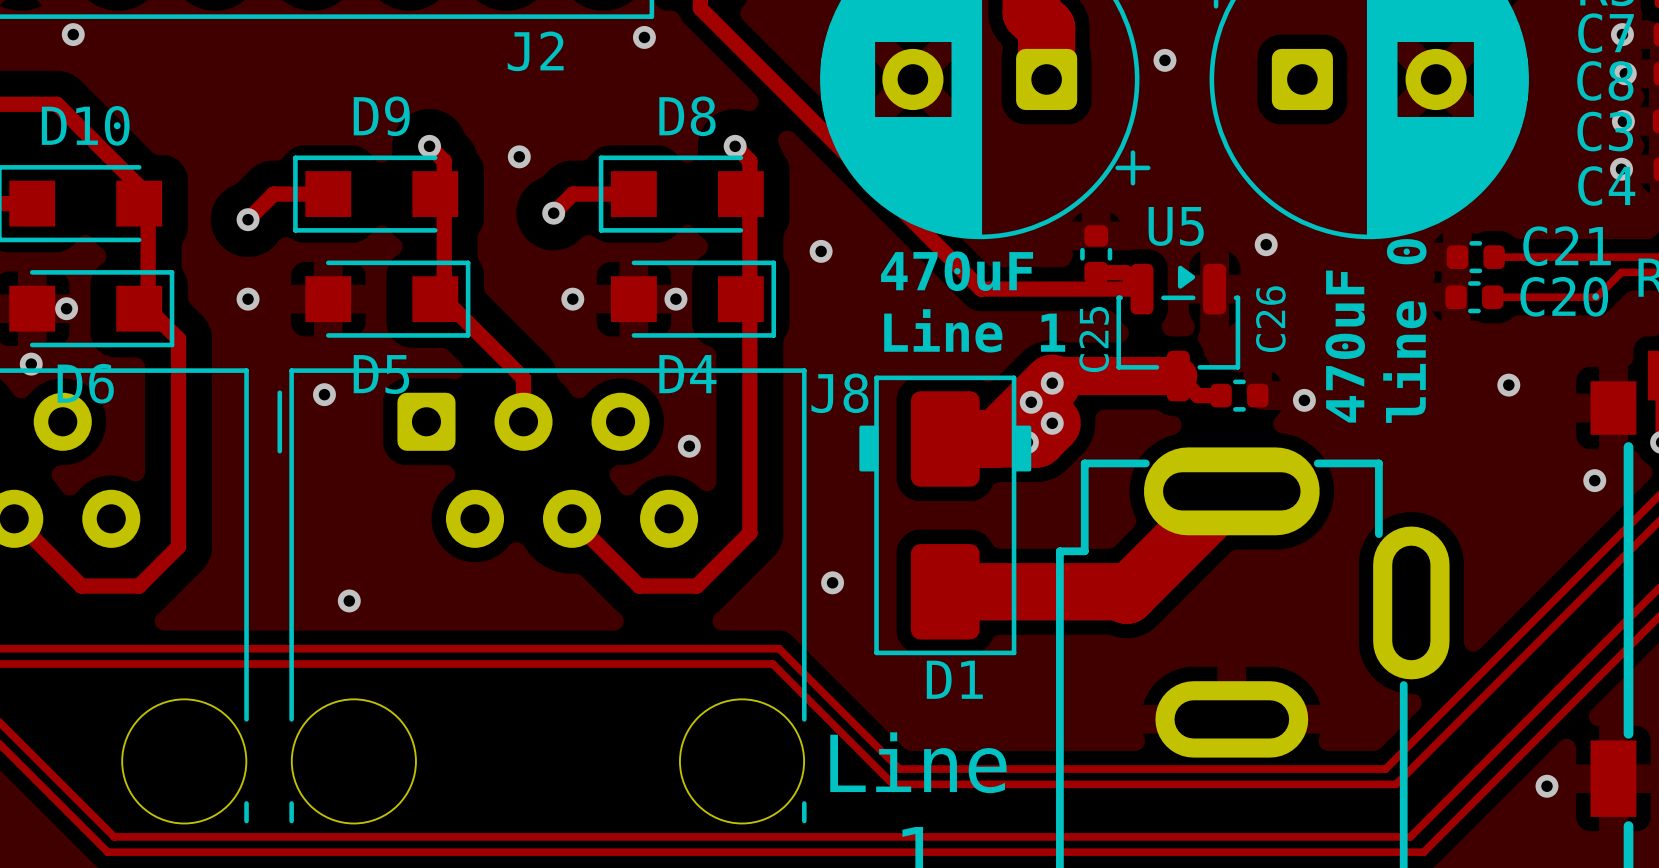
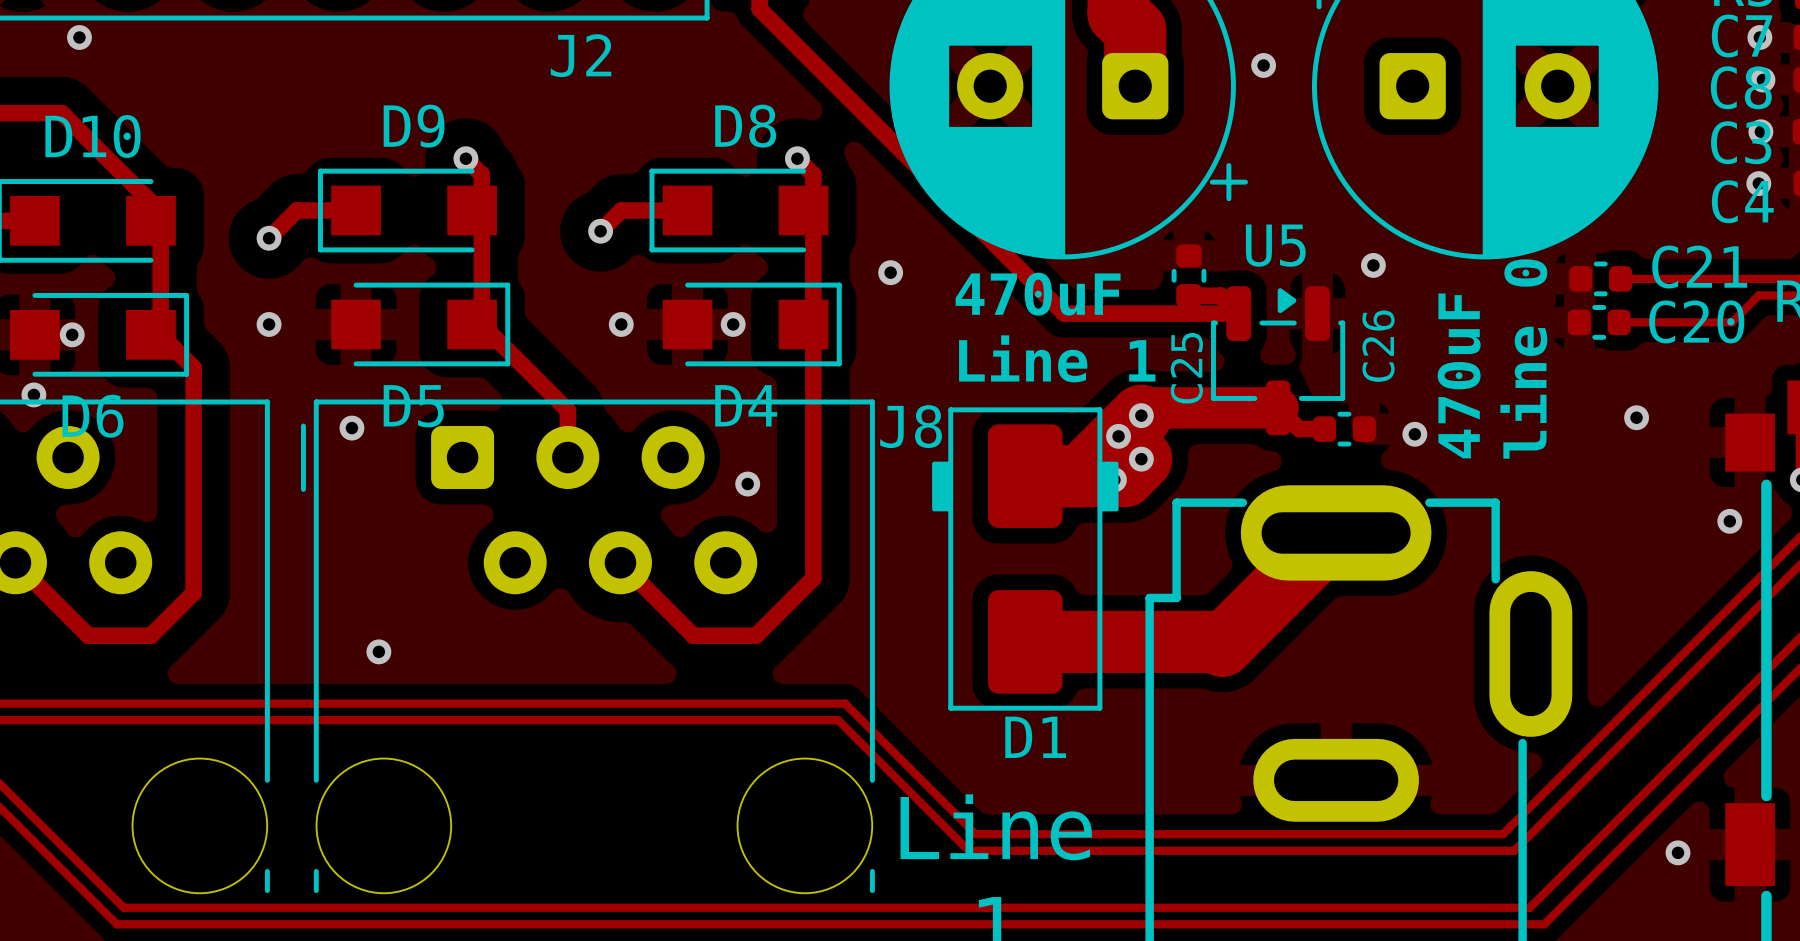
via: (644, 37) -> none
via: (519, 156) -> none
via: (832, 582) -> none

